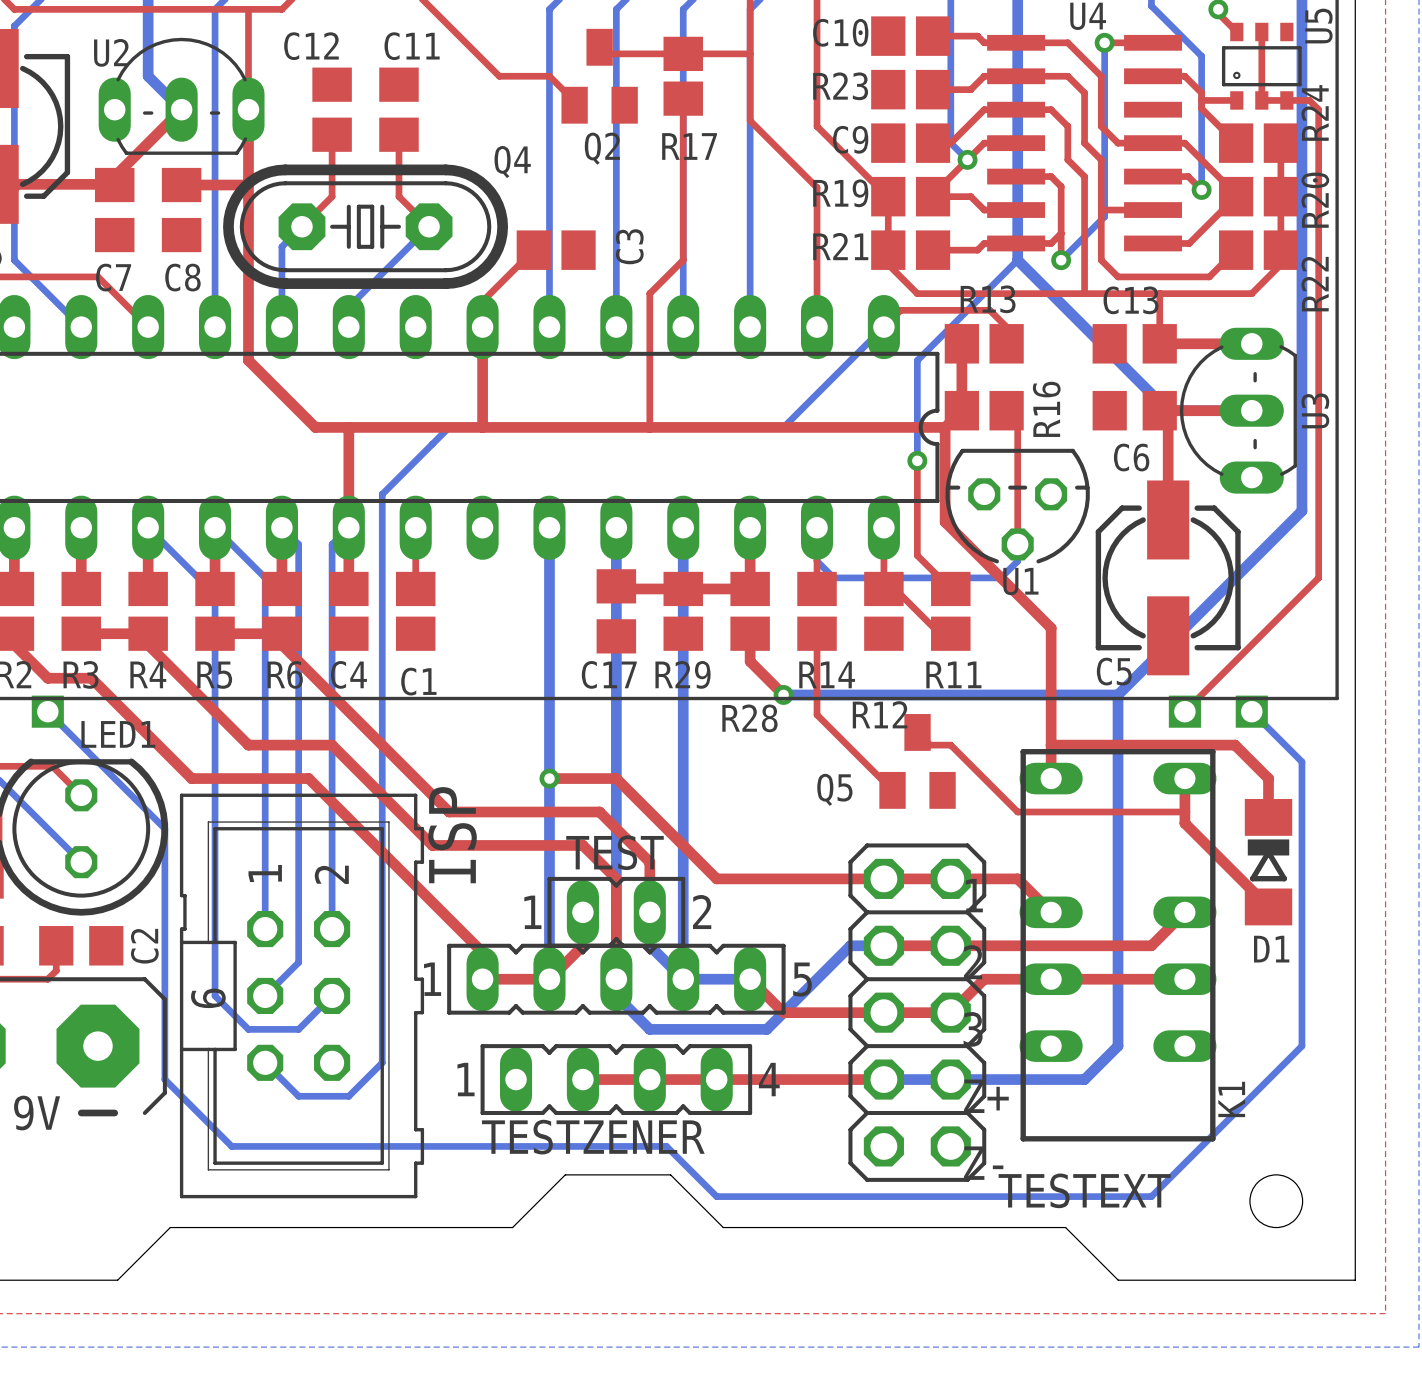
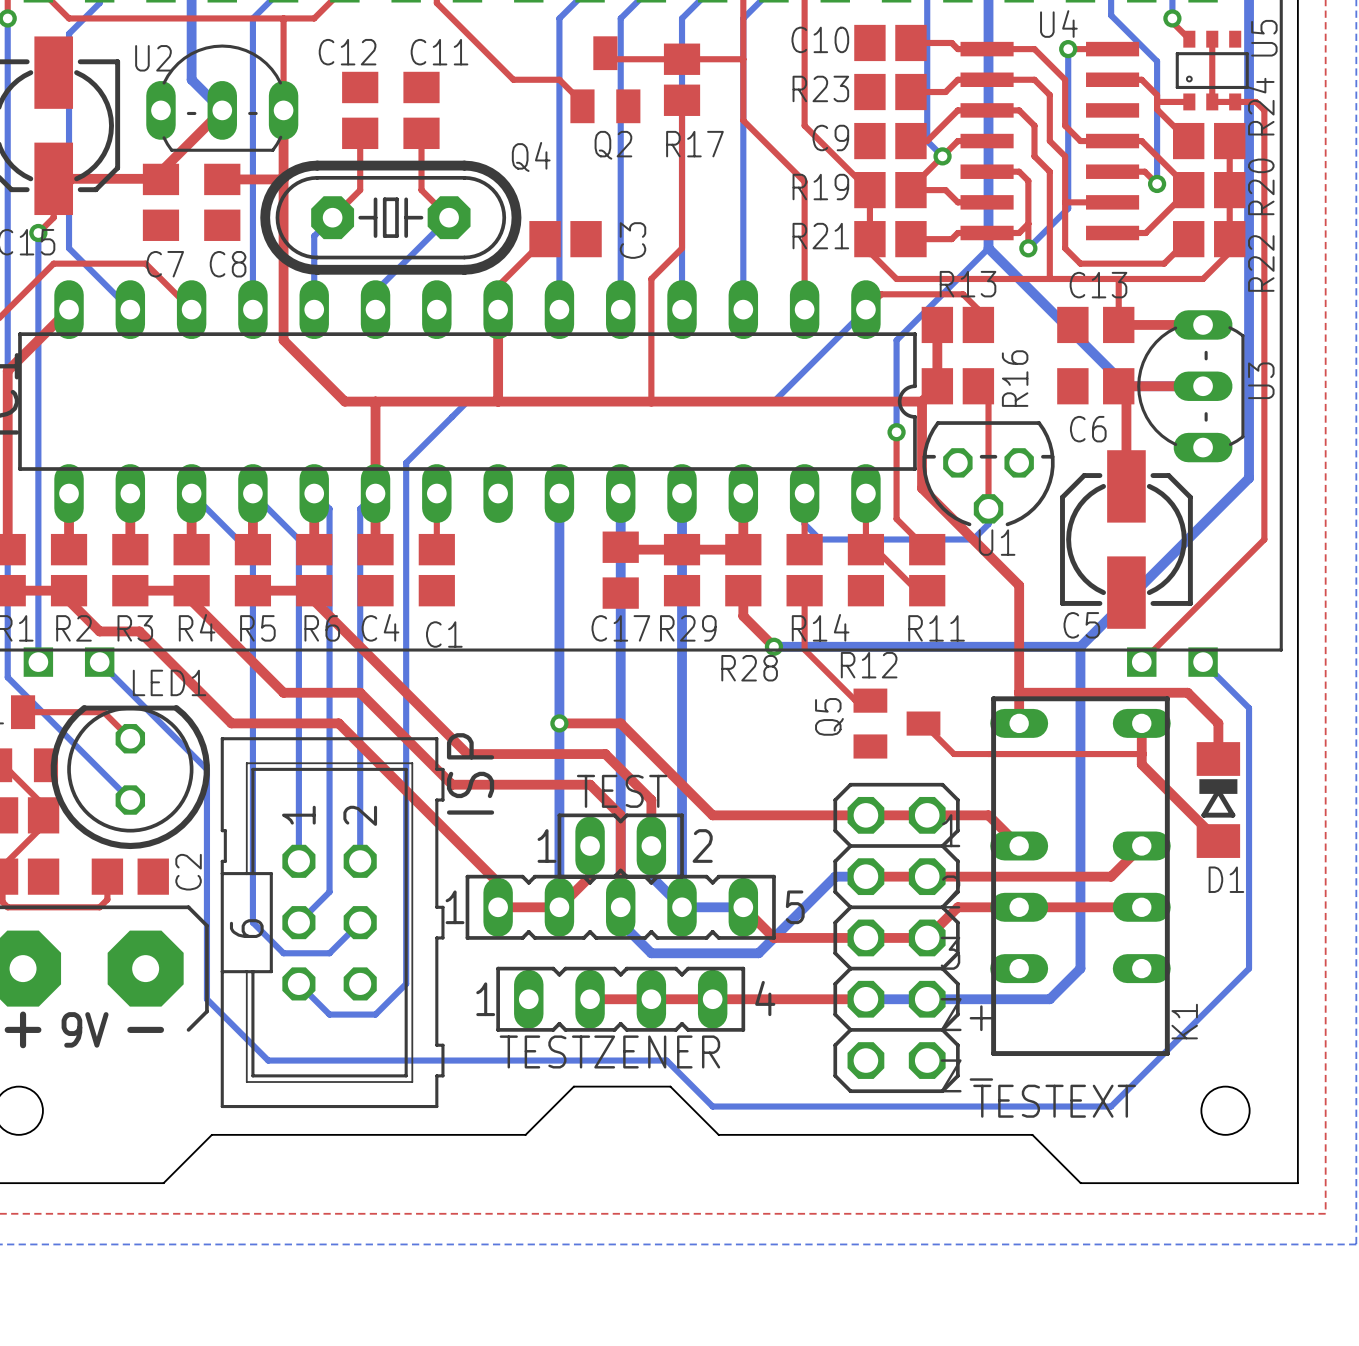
top track: (817, 698) (817, 714) (892, 790) -> (804, 649) (855, 700) (870, 700)
top track: (917, 732) (930, 745) (950, 745) (1017, 812) -> (923, 723) (953, 754) (988, 754)
Q5 rotation: 0° (917, 761) -> 90° clockwise (896, 723)

